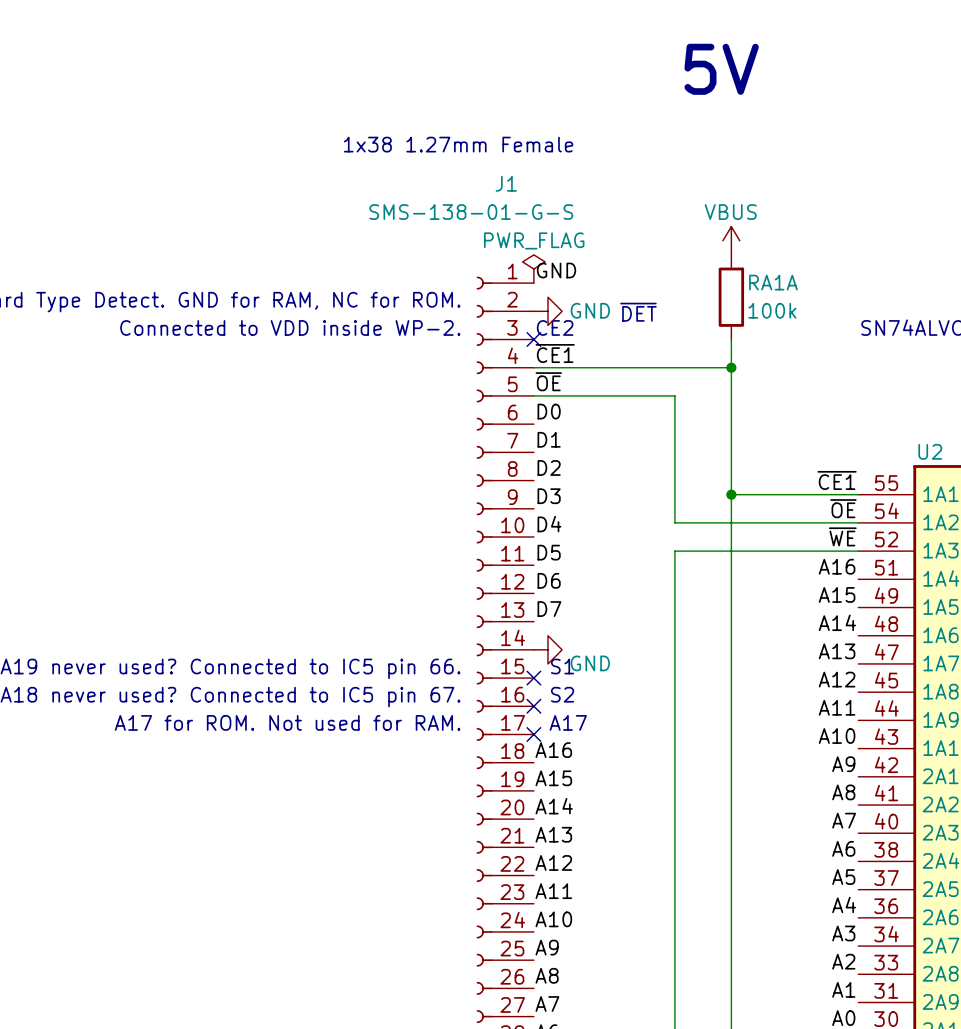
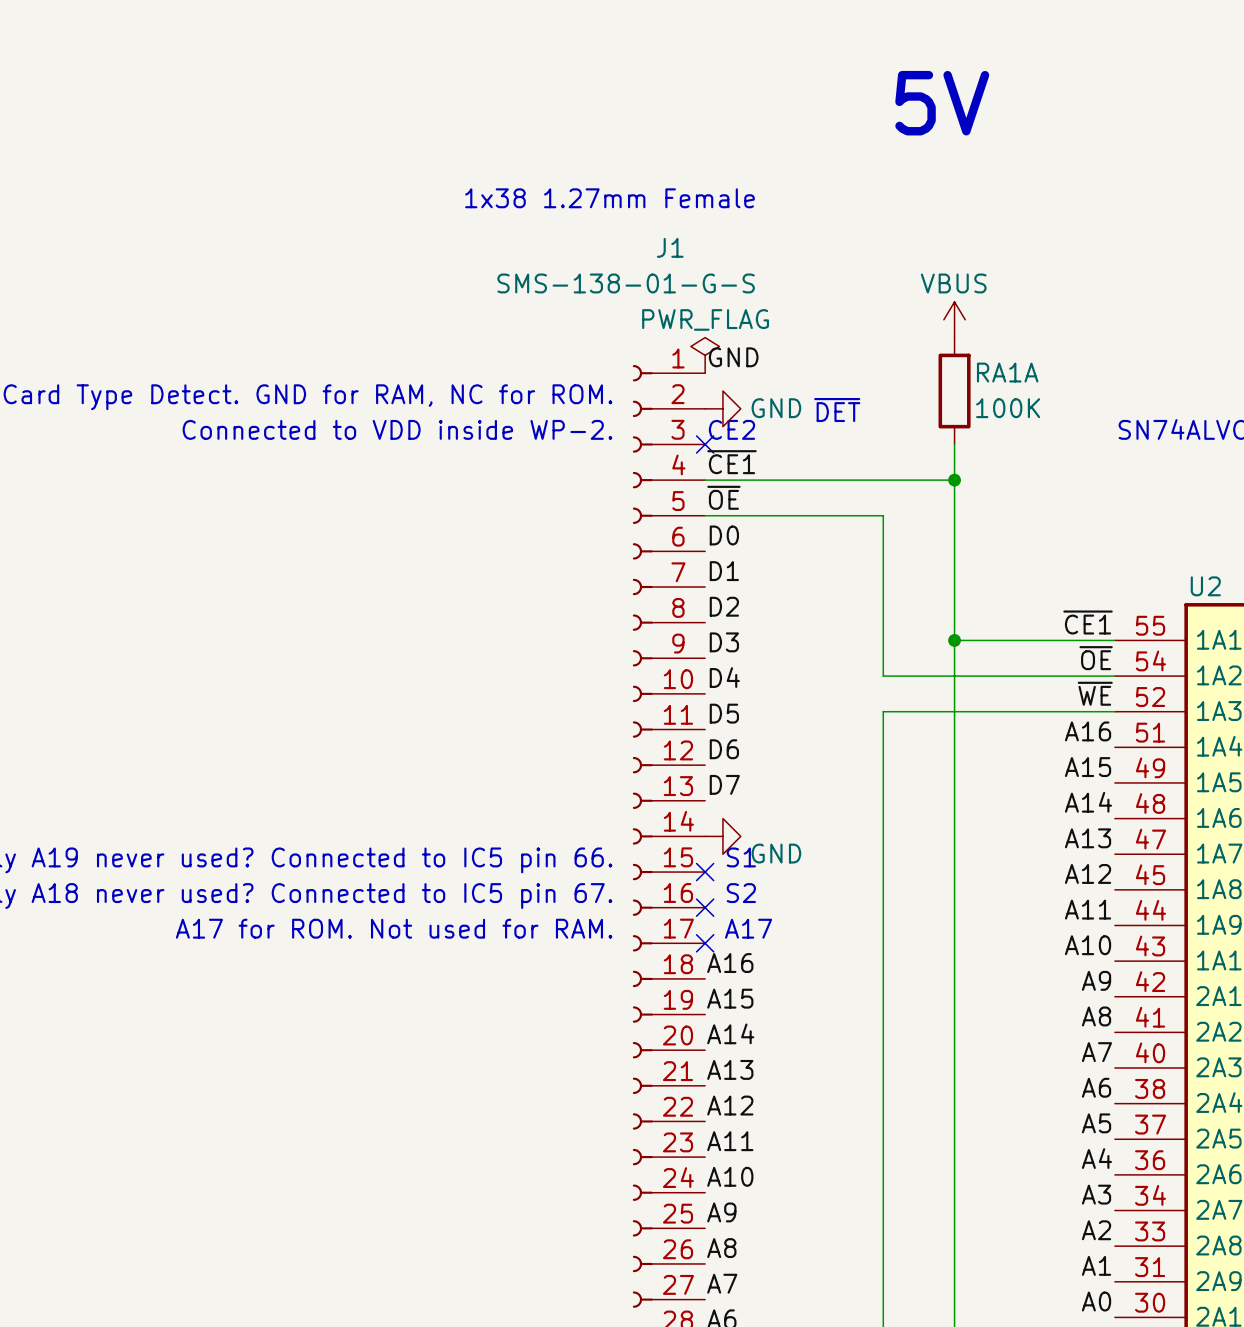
RA1A value: 100k (772, 310) -> 100K (1008, 408)

